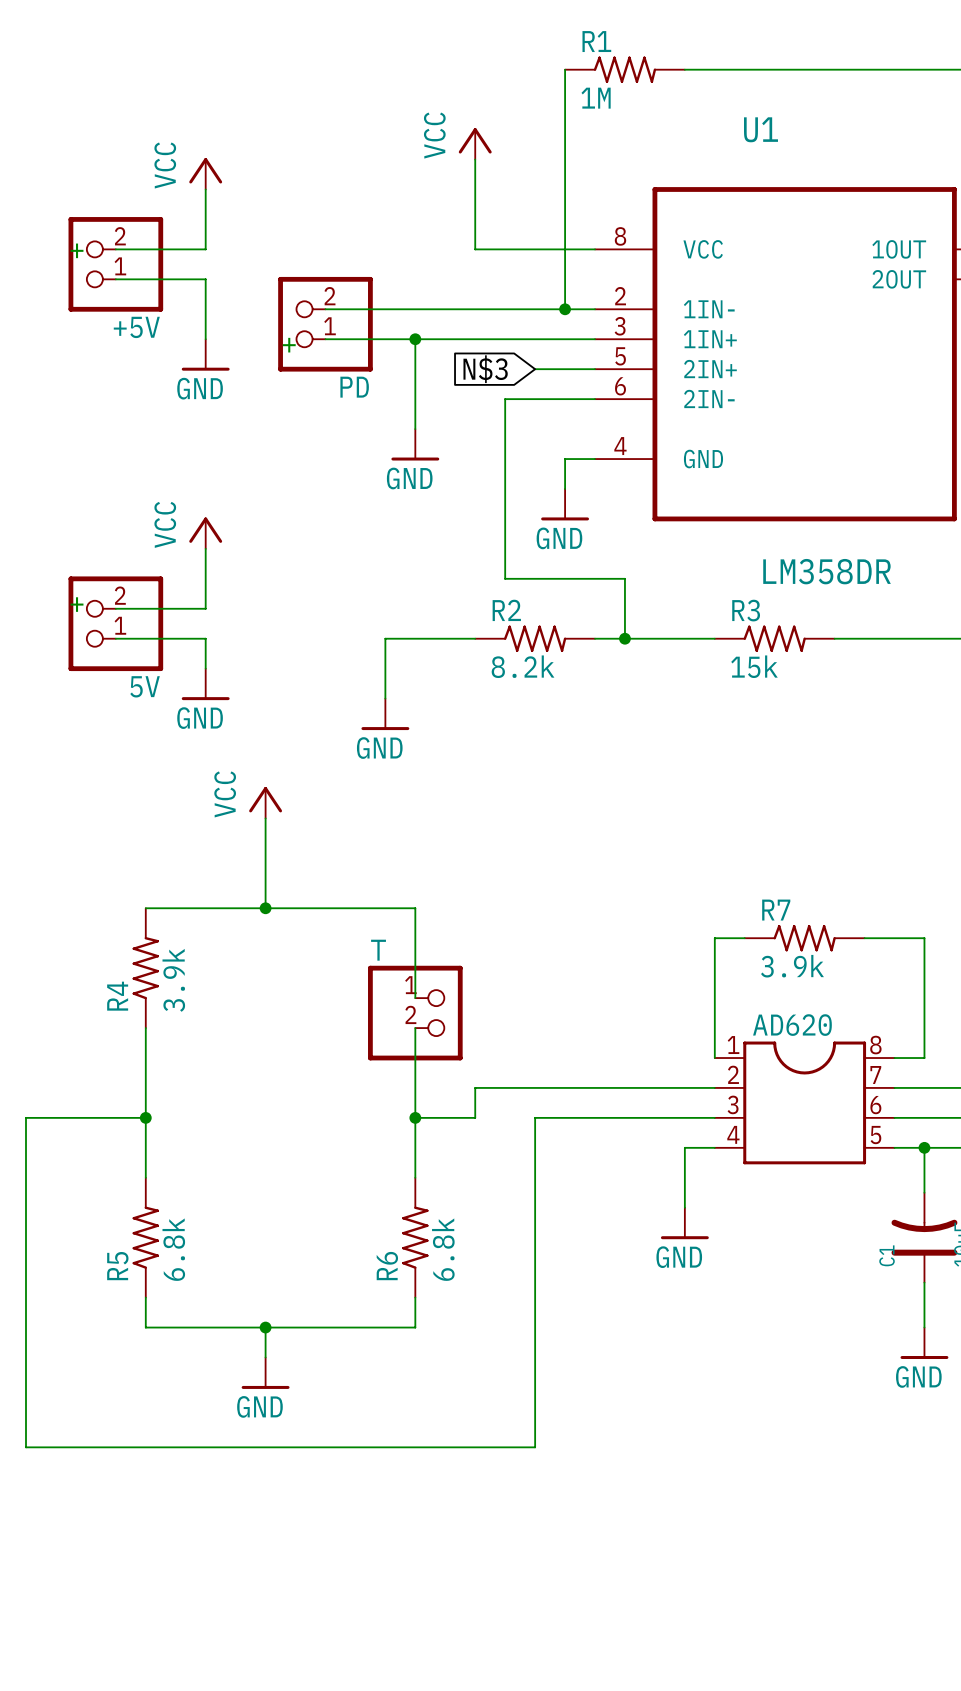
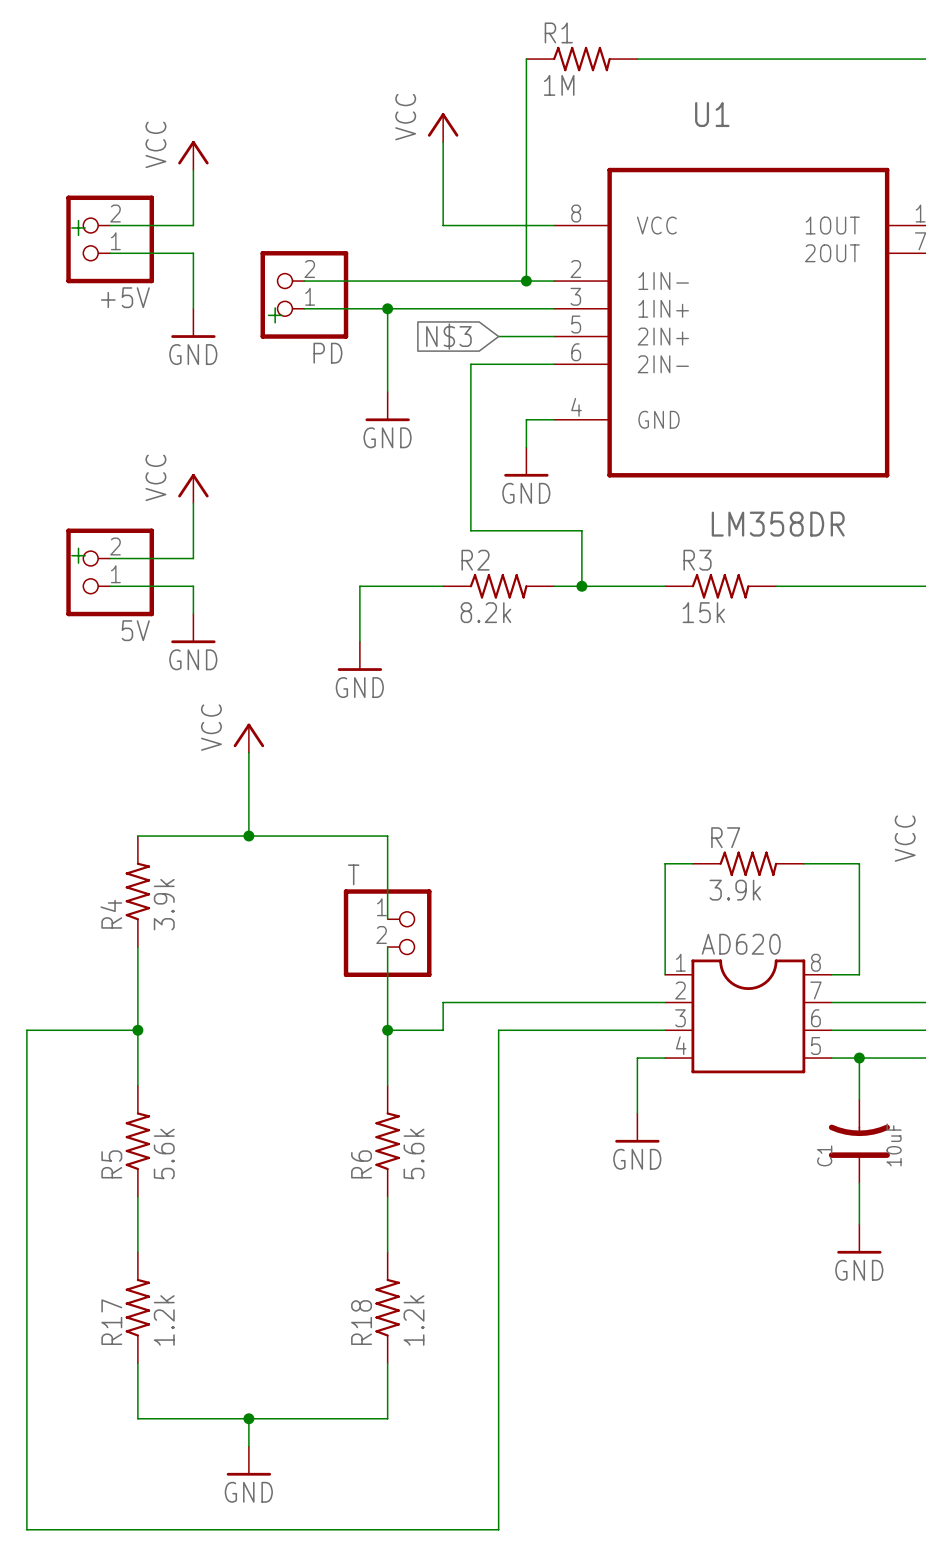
R5 value: 6.8k (173, 1249) -> 5.6k (164, 1153)
R6 value: 6.8k (443, 1249) -> 5.6k (414, 1153)
wire: (145, 1327) (415, 1327) -> (137, 1224) (137, 1252)
wire: (265, 1327) (265, 1357) -> (387, 1224) (387, 1252)
junction: (265, 1327) -> none
power symbol position: GND (265, 1373) -> GND (248, 1461)
R17: none -> 1.2k (137, 1307)
R18: none -> 1.2k (387, 1307)
wire: (26, 1447) (535, 1447) -> (26, 1335) (26, 1529) (498, 1529) (498, 1335)
wire: none -> (137, 1363) (137, 1418) (387, 1418) (387, 1363)
wire: none -> (248, 1418) (248, 1446)
junction: none -> (248, 1418)

